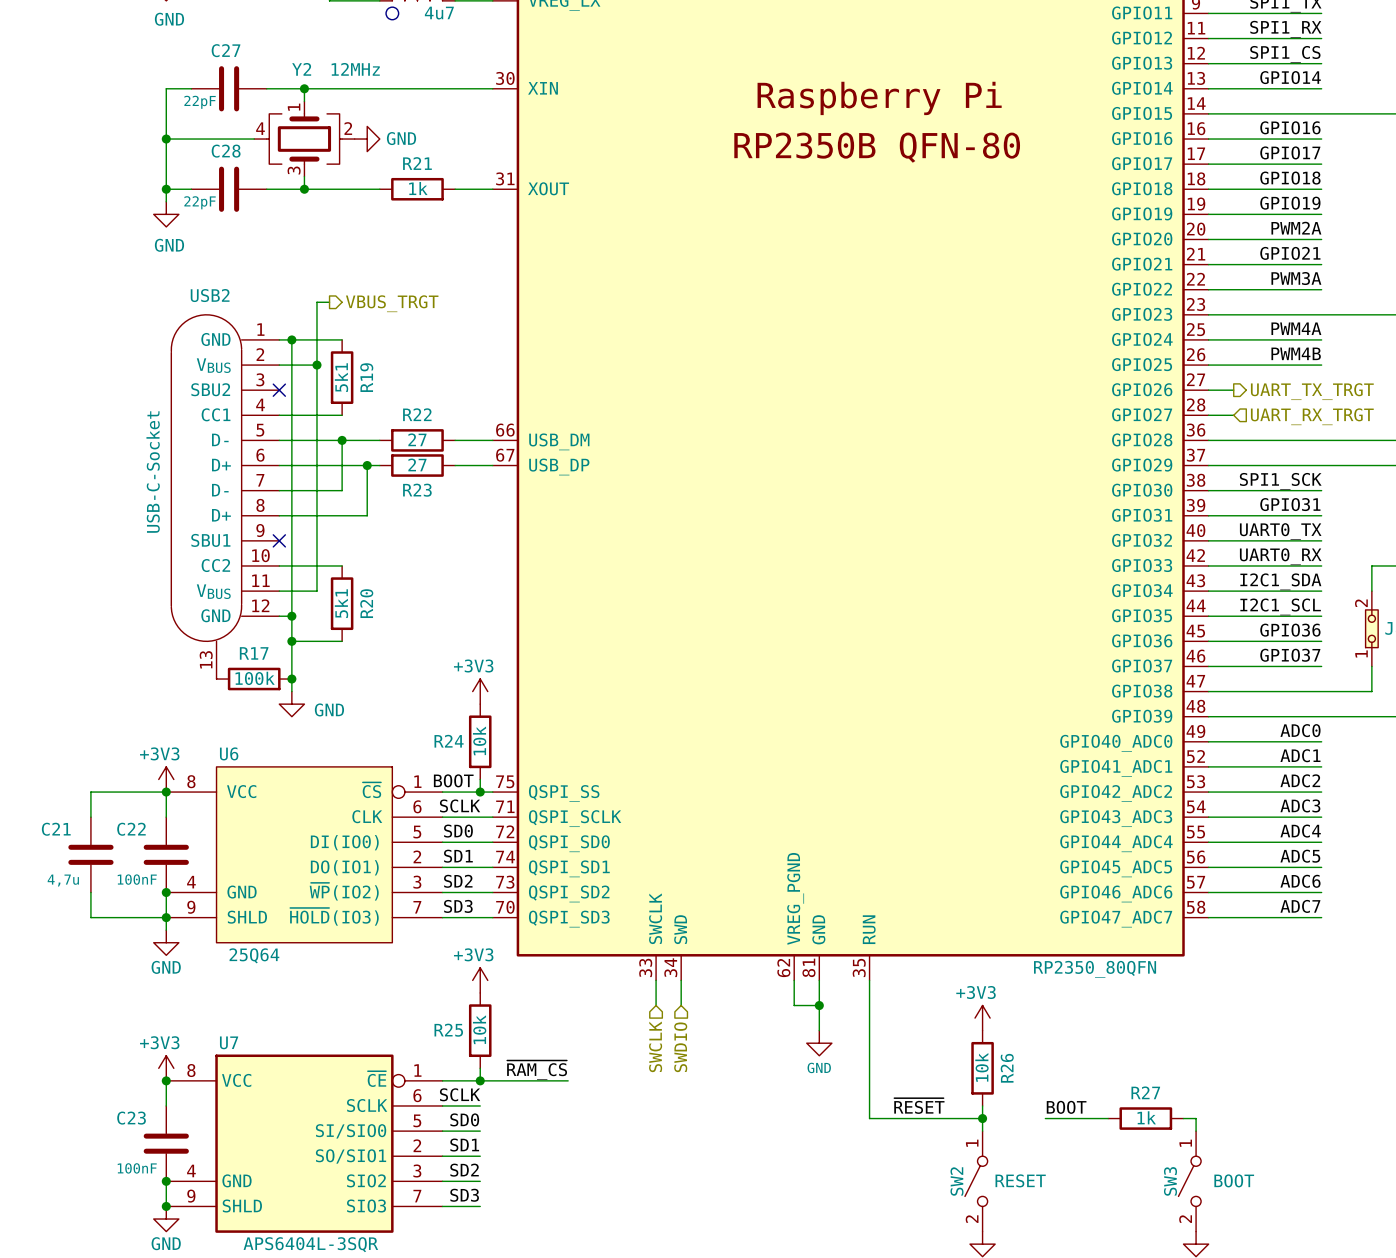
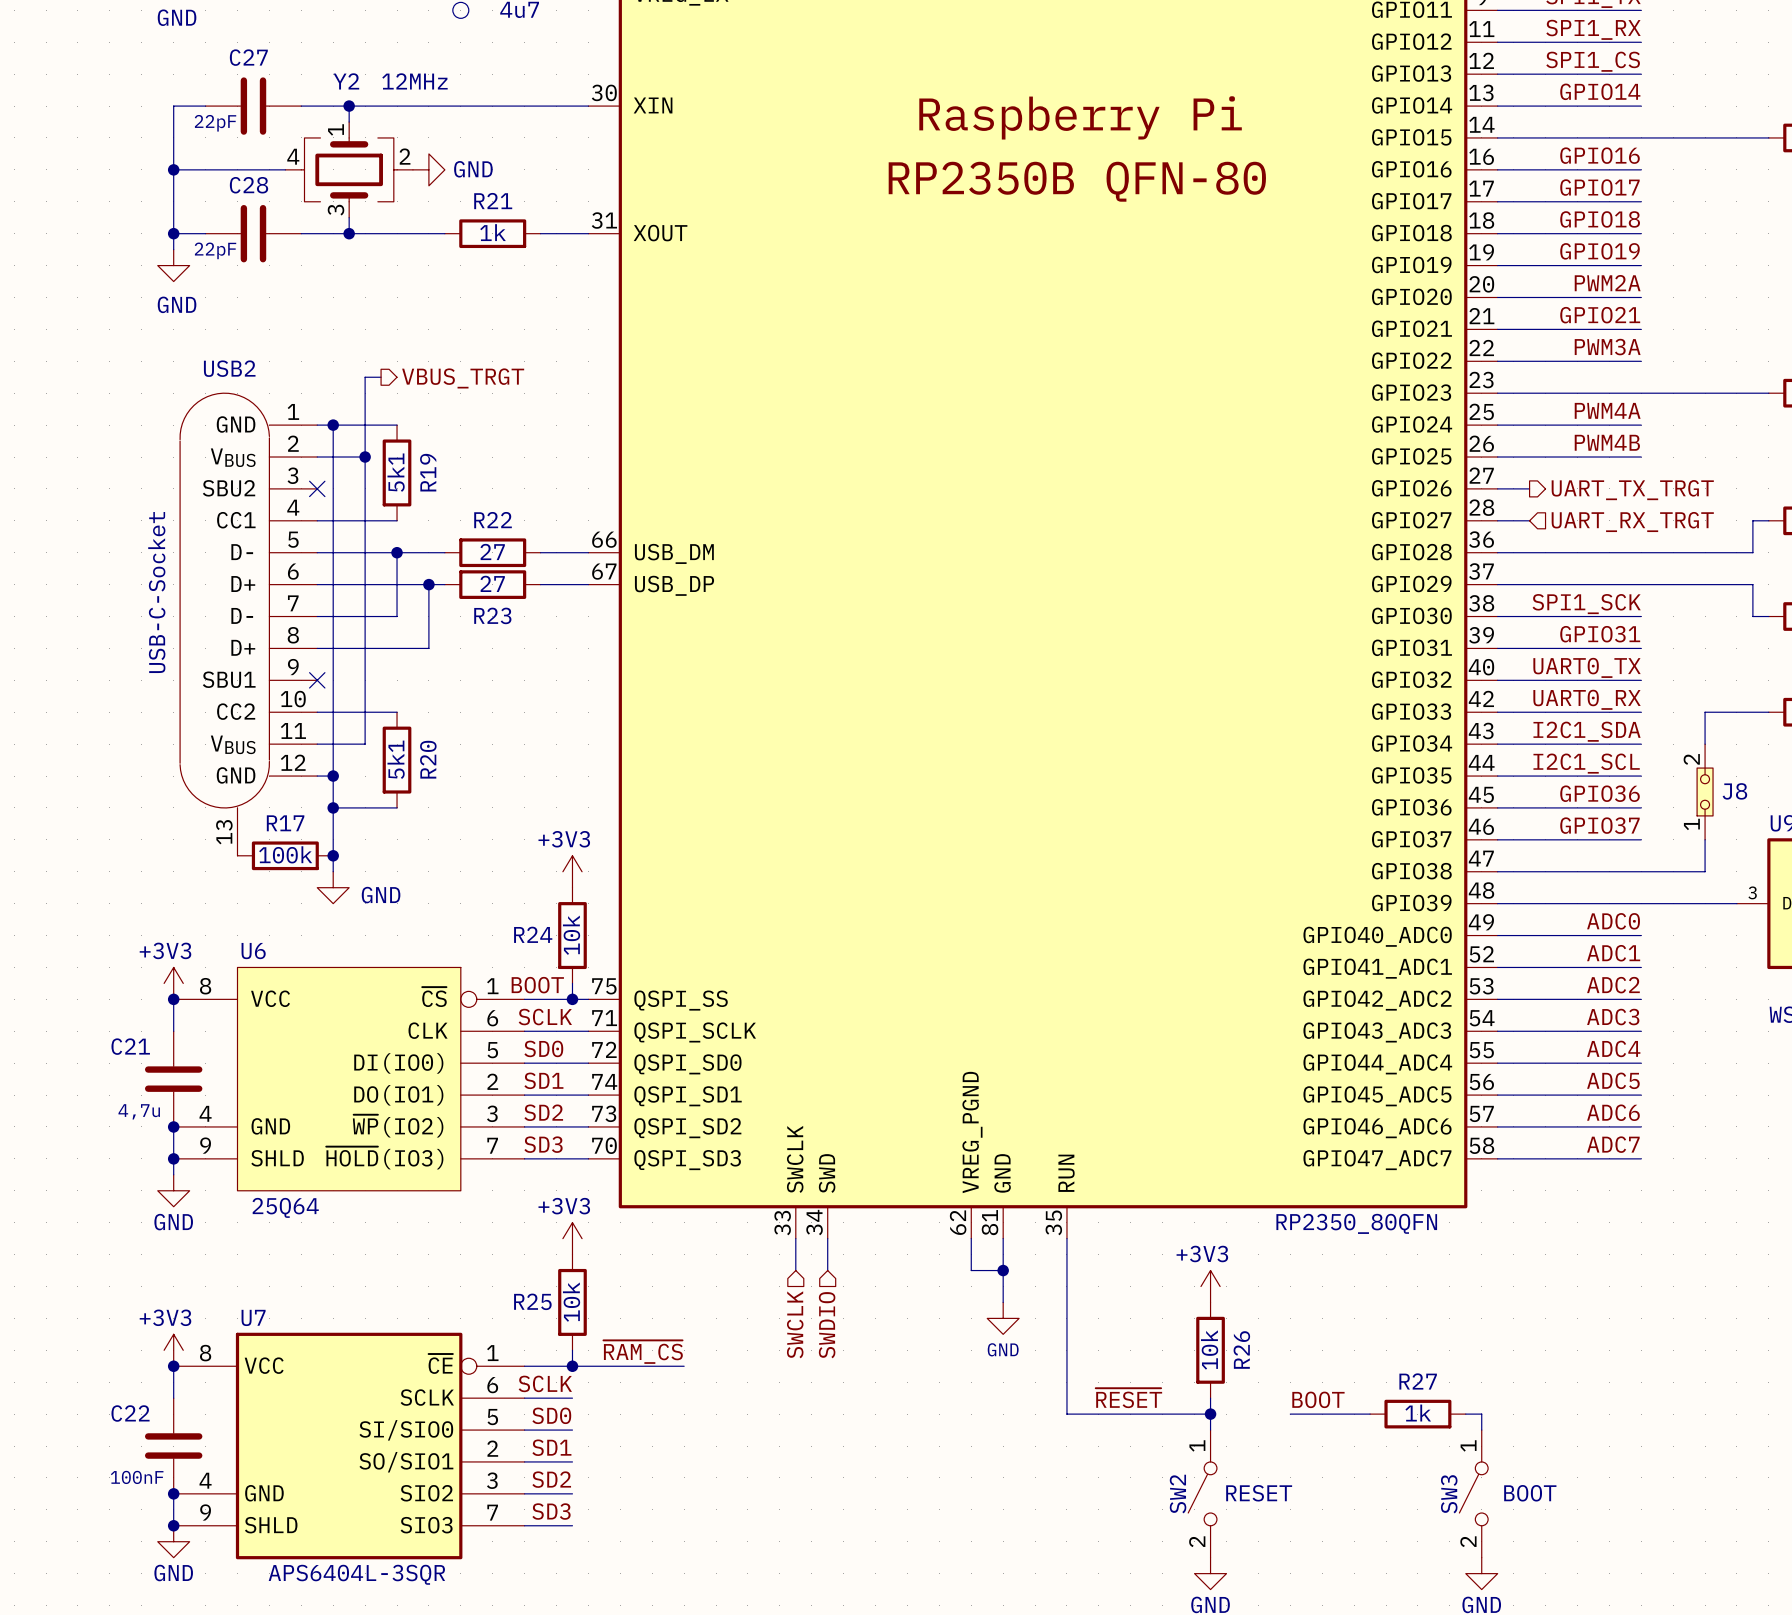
wire: (166, 792) (90, 792) (90, 817) -> none
C22 name: C22 (131, 829) -> C21 (130, 1046)
C21: 4,7u (90, 854) -> none
C22 value: 100nF (137, 879) -> 4,7u (139, 1111)
wire: (90, 892) (90, 917) (166, 917) -> none
C23 name: C23 (131, 1118) -> C22 (130, 1413)

